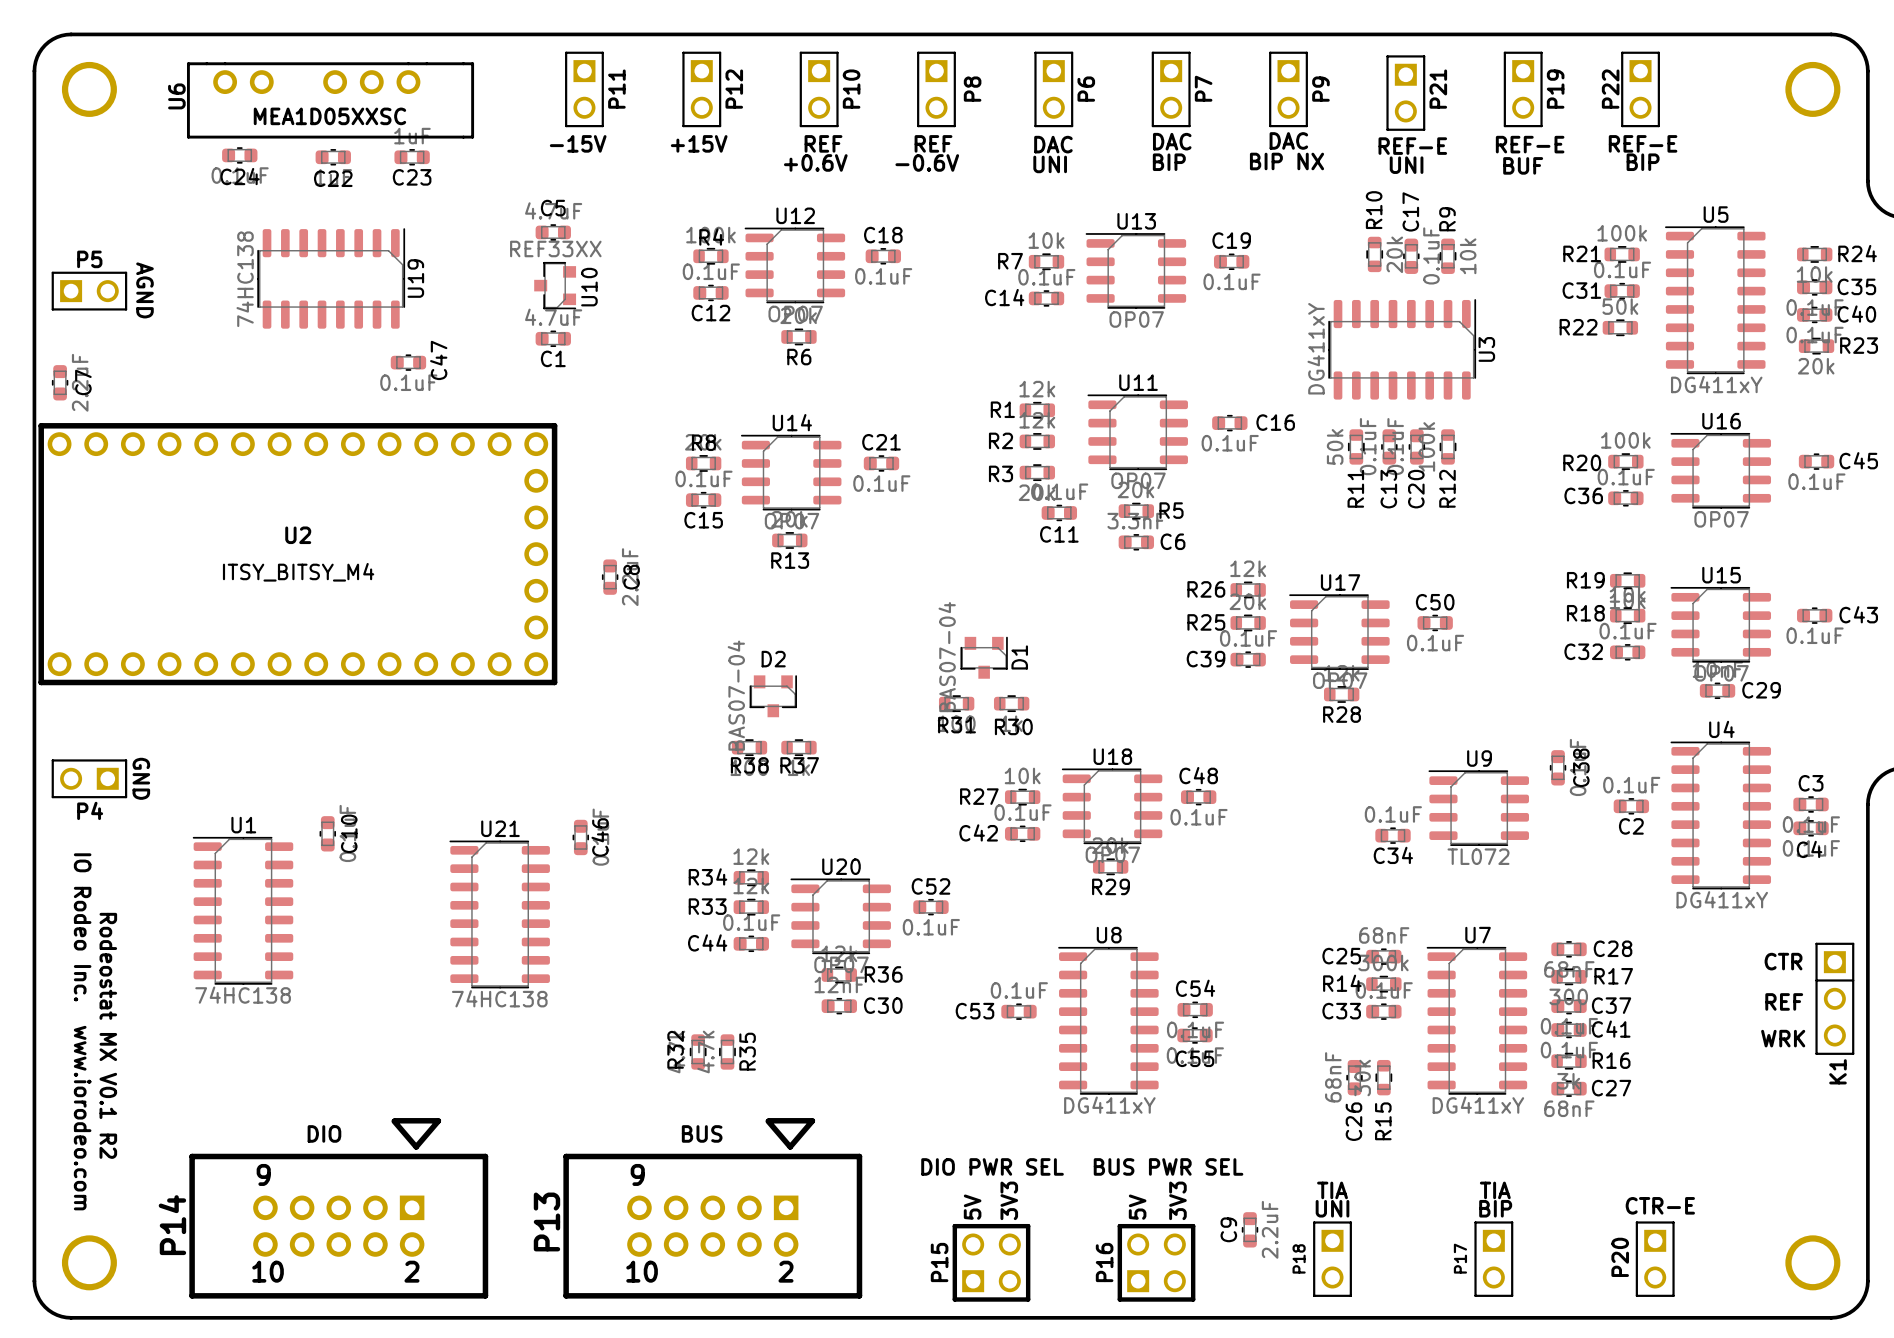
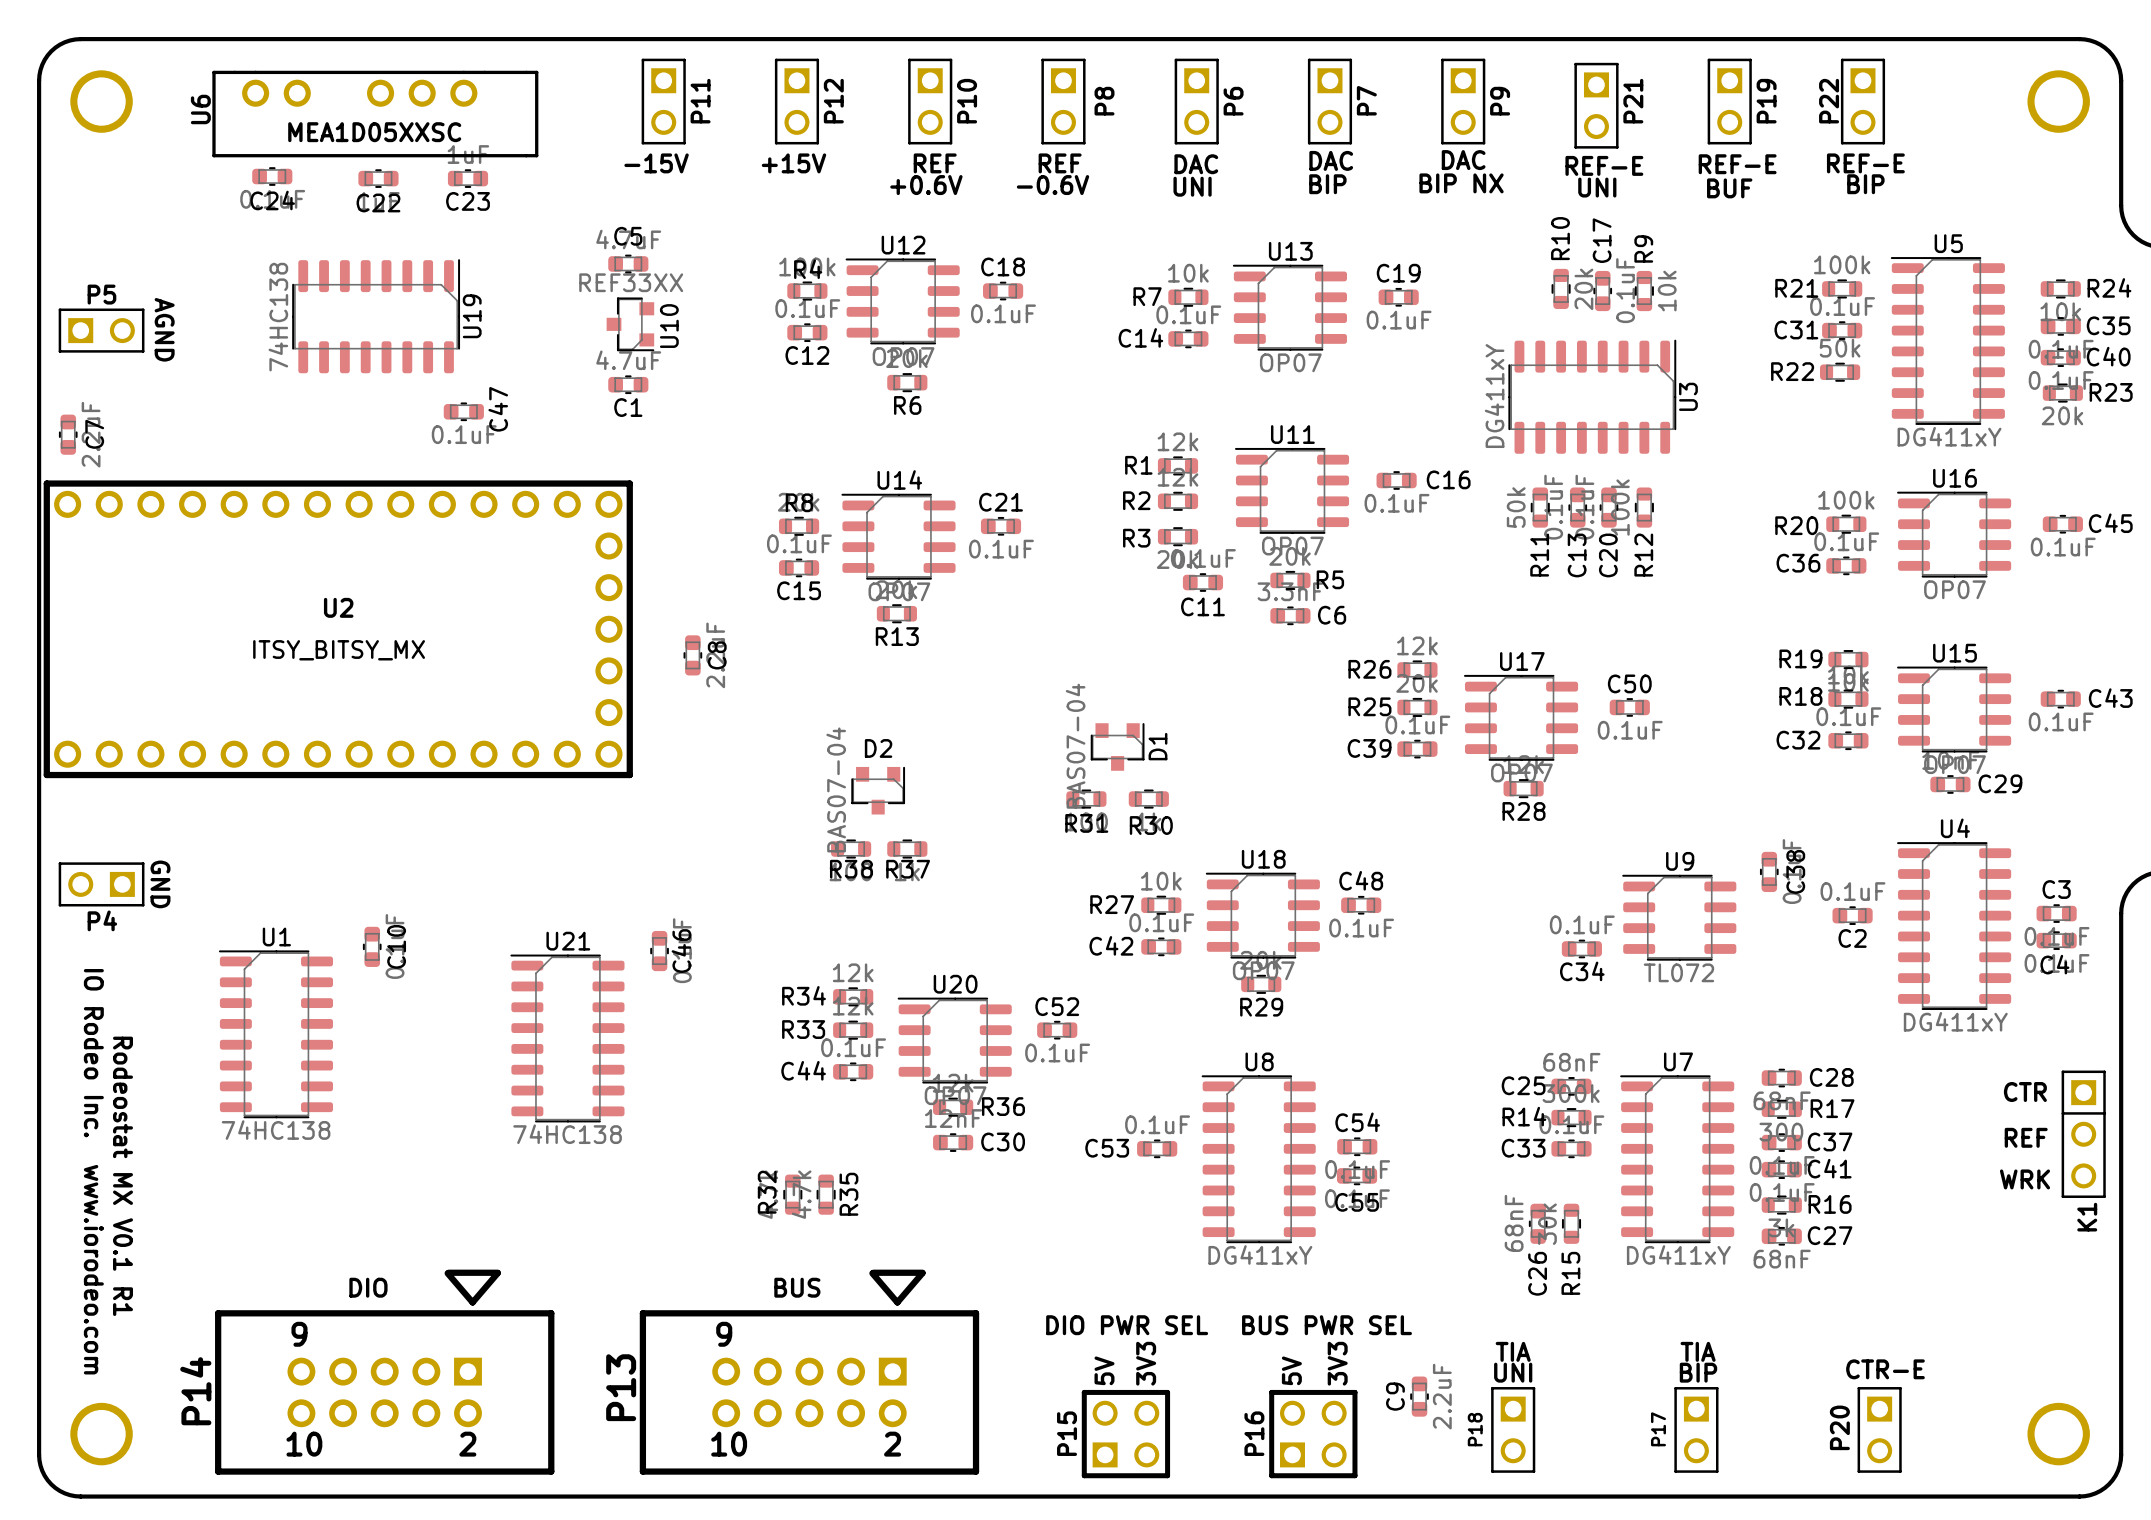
U2 value: ITSY_BITSY_M4 (298, 572) -> ITSY_BITSY_MX (339, 650)
text: Rodeostat MX V0.1 R2 (108, 1035) -> Rodeostat MX V0.1 R1 (123, 1176)

